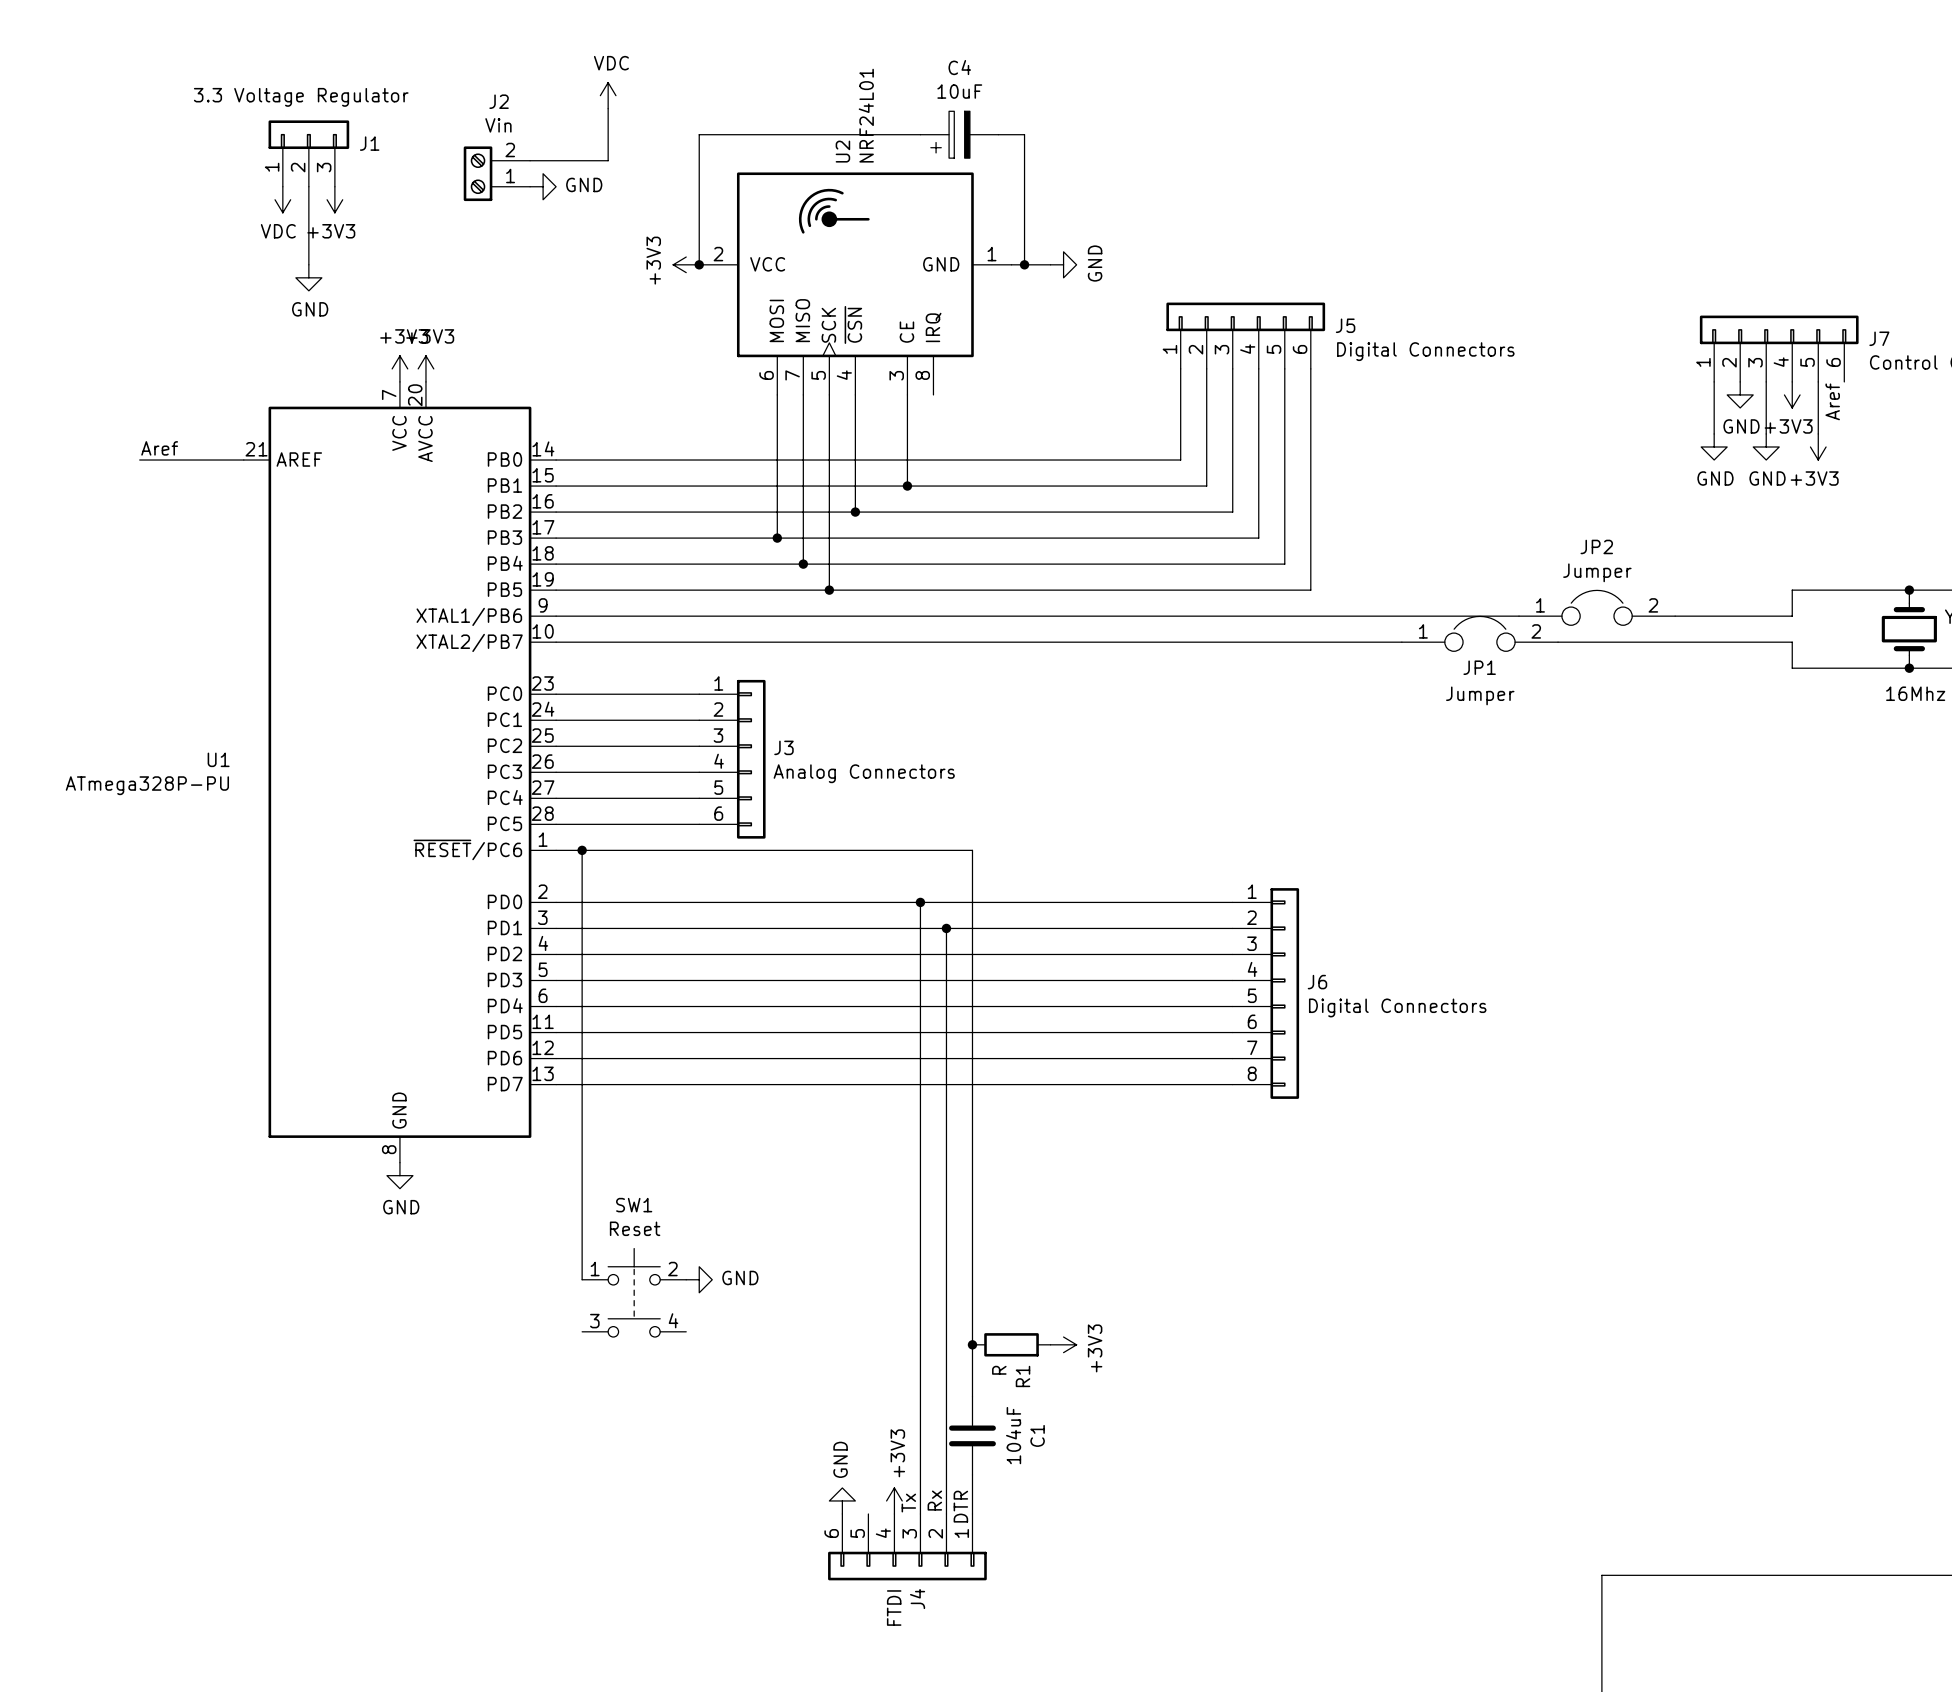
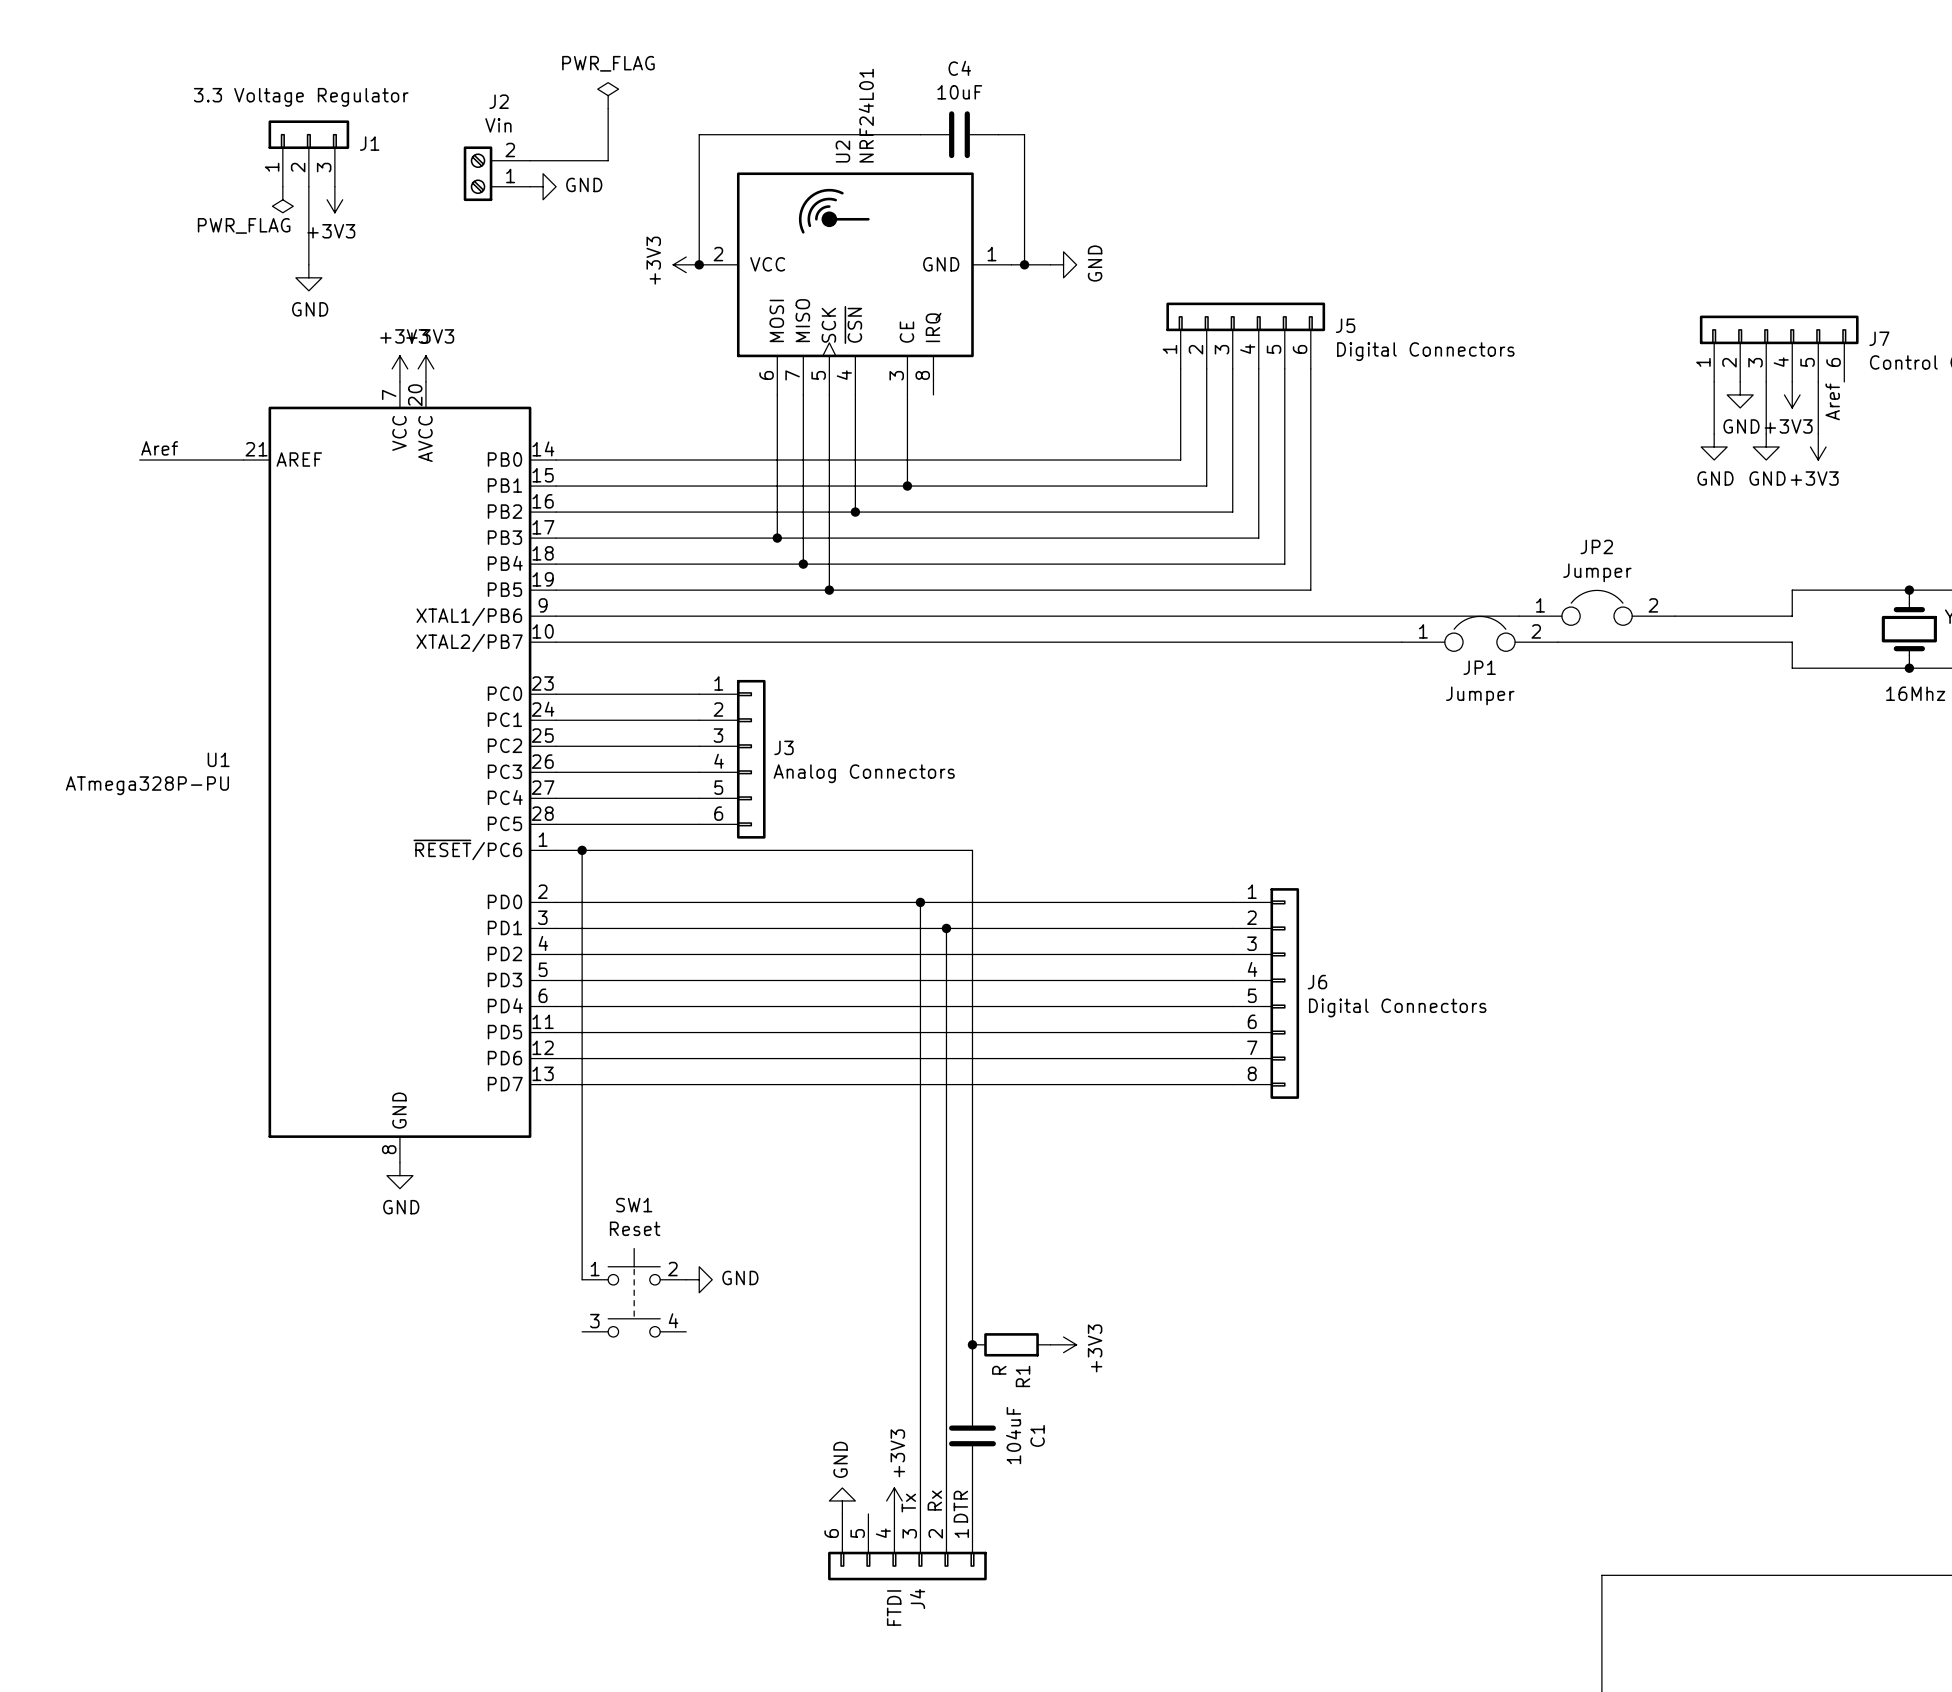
power symbol: VDC (608, 95) -> PWR_FLAG (608, 95)
C4 symbol: [920, 111, 999, 159] -> [920, 111, 999, 159]
power symbol: VDC (282, 199) -> PWR_FLAG (282, 199)

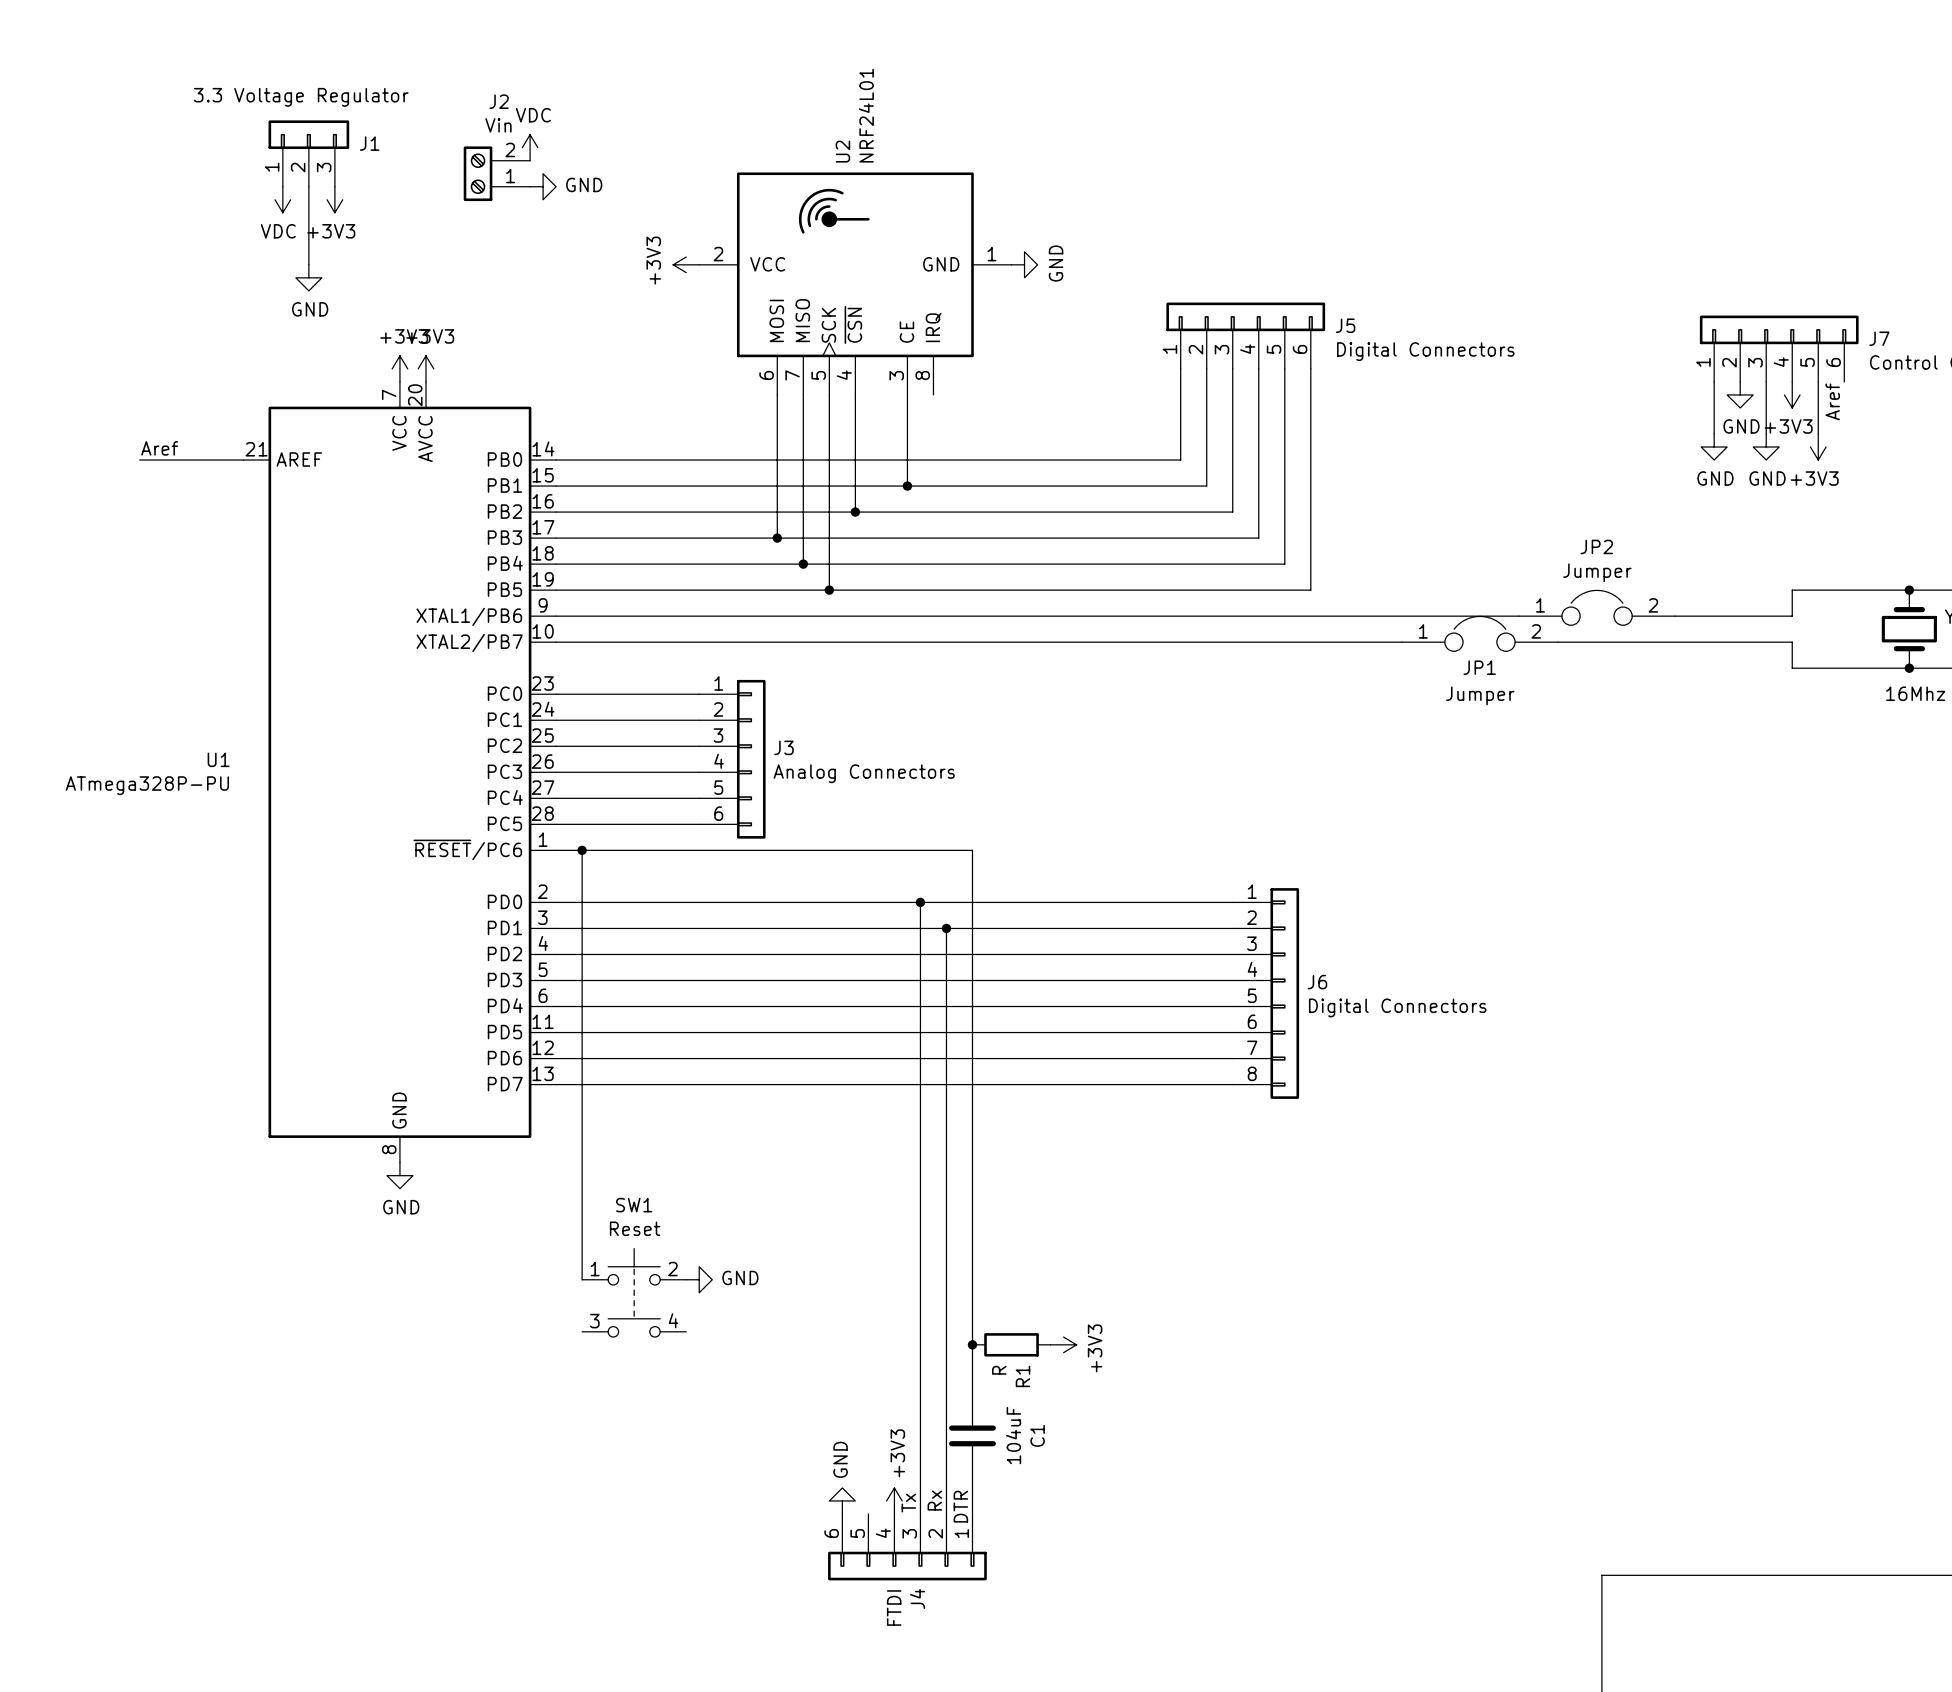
power symbol: PWR_FLAG (608, 95) -> none
wire: (608, 108) (608, 160) (530, 160) -> none
wire: (920, 134) (699, 134) (699, 264) -> none
C4: 10uF (959, 134) -> none
wire: (998, 134) (1024, 134) (1024, 264) -> none
power symbol: none -> VDC (530, 147)
power symbol: PWR_FLAG (282, 199) -> VDC (282, 199)
junction: (699, 264) -> none
wire: (1011, 264) (1050, 264) -> none
junction: (1024, 264) -> none
power symbol position: GND (1063, 264) -> GND (1024, 264)

